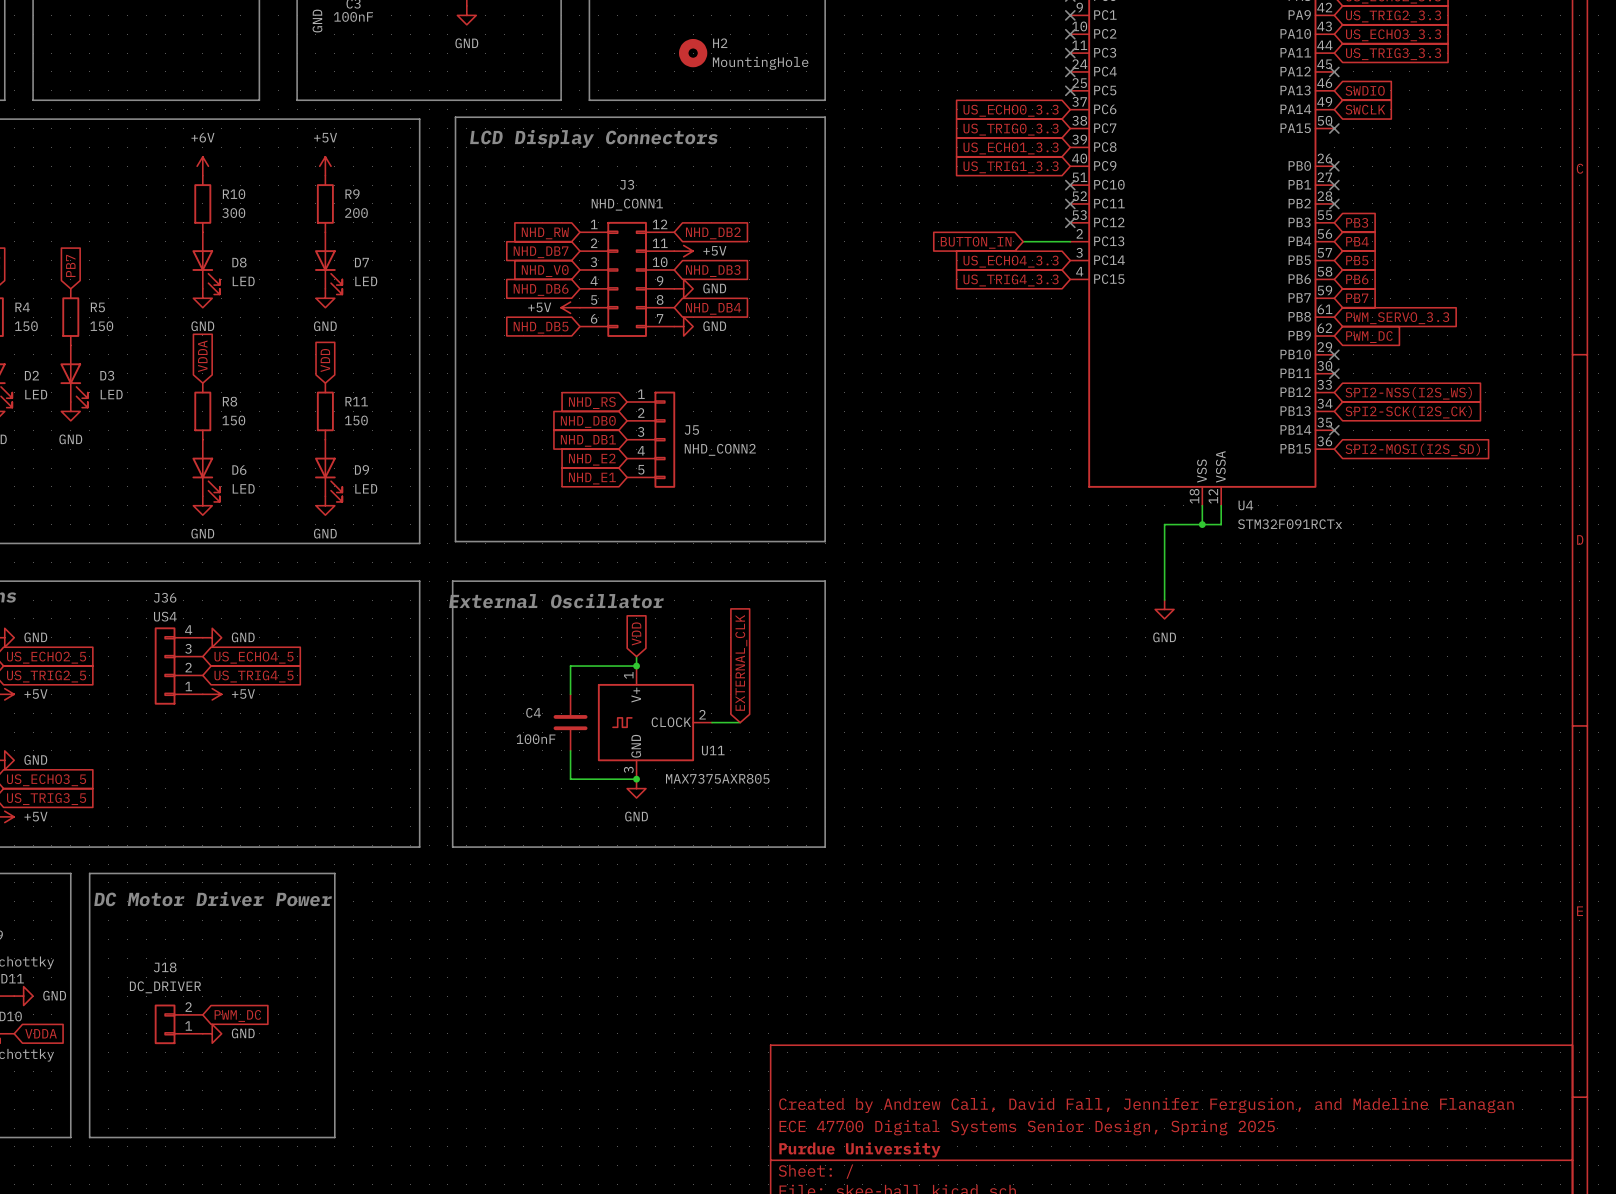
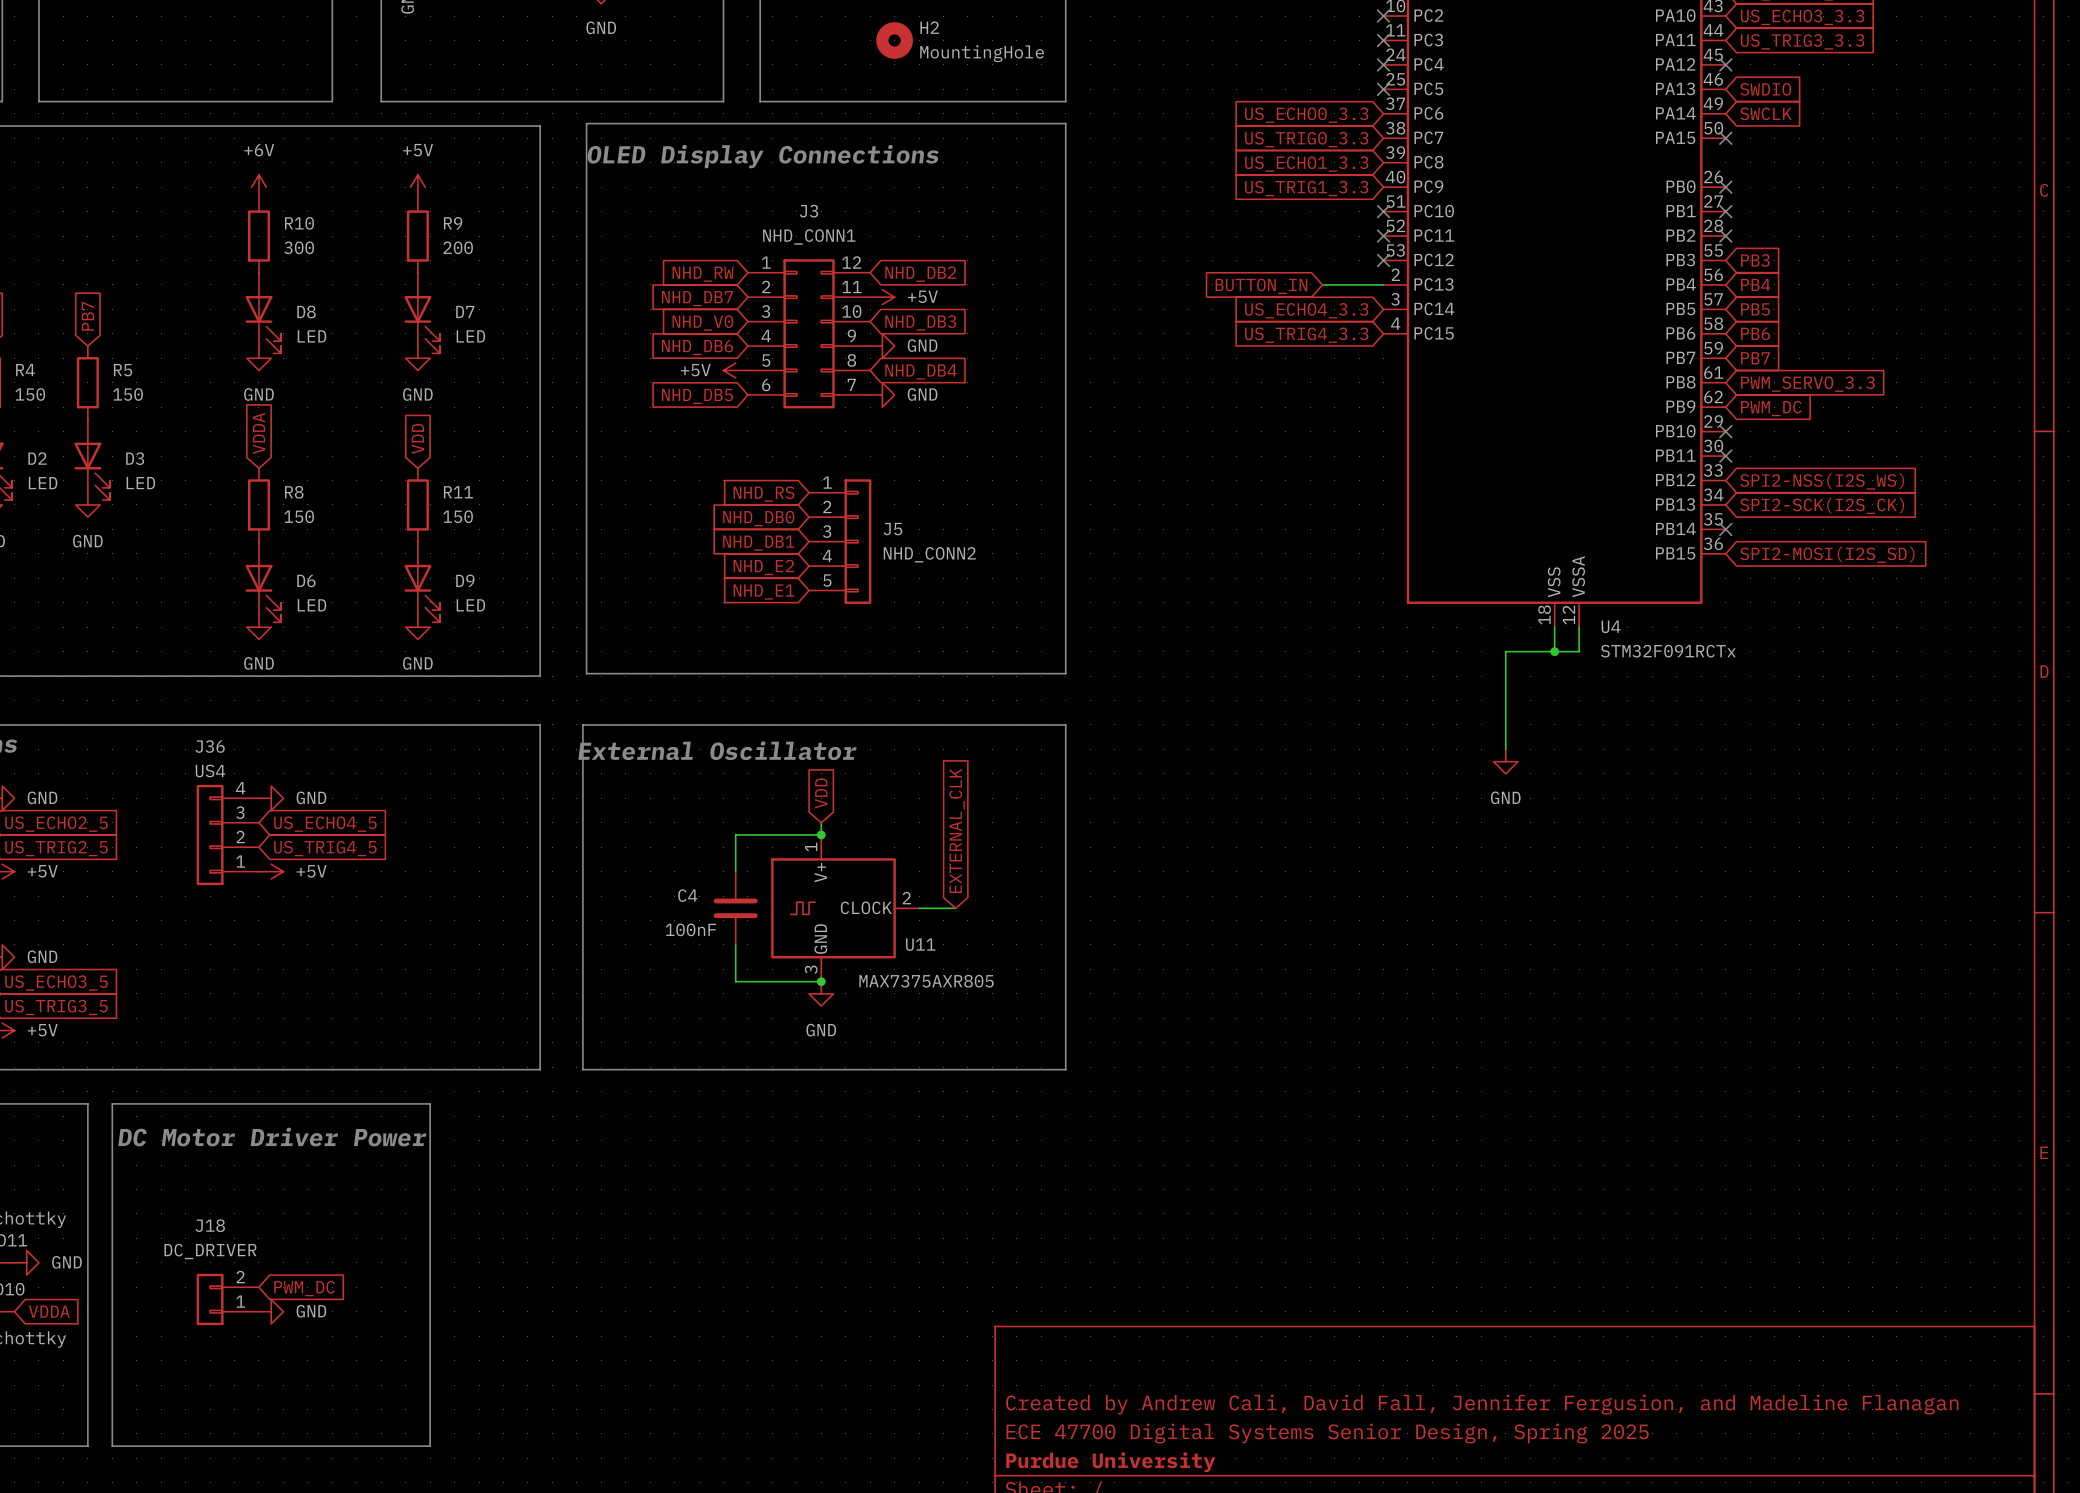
text: LCD Display Connectors (593, 138) -> OLED Display Connections (763, 156)

